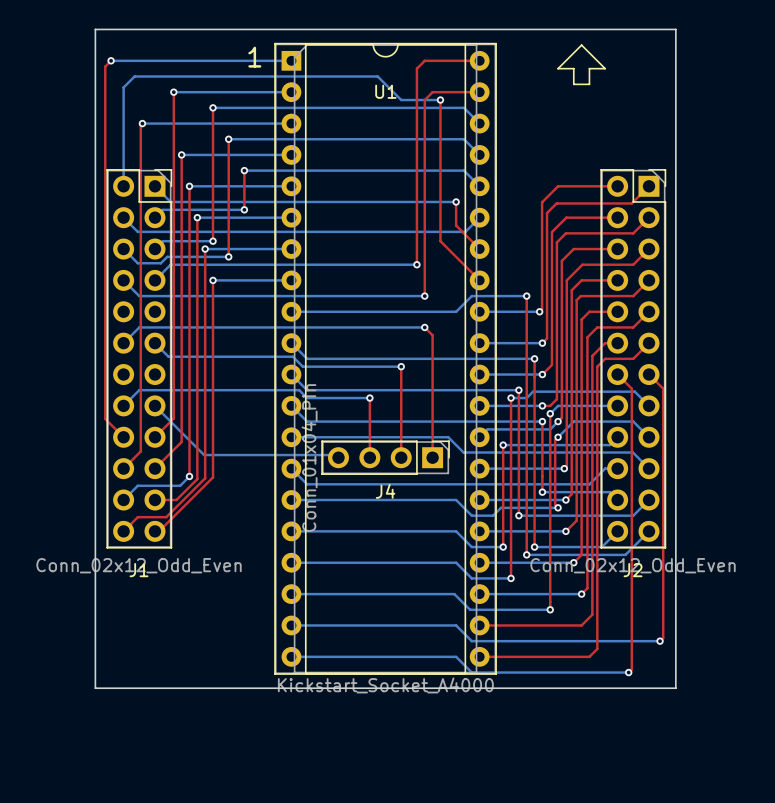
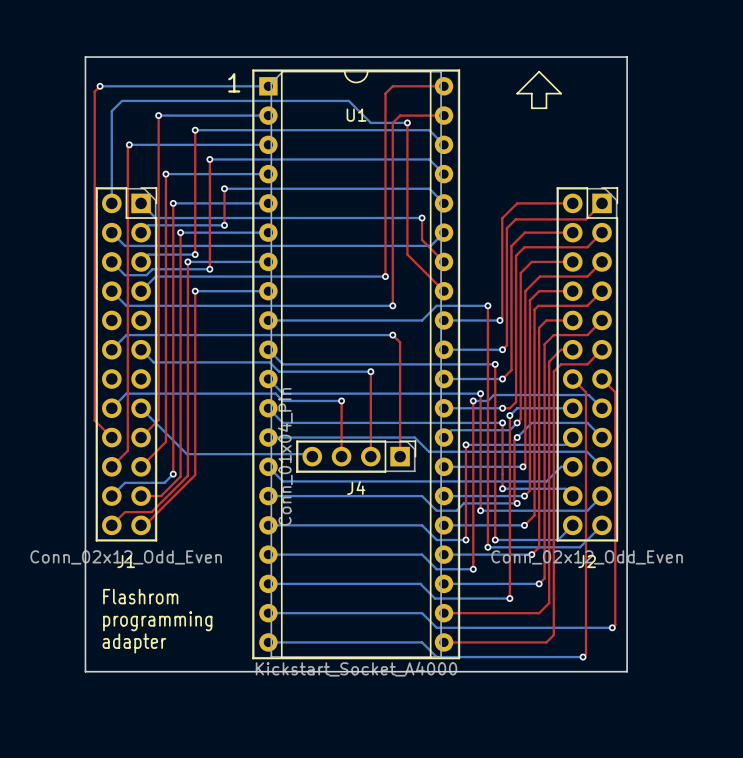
text: none -> Flashrom (140, 596)
text: none -> programming (157, 621)
text: none -> adapter (134, 643)

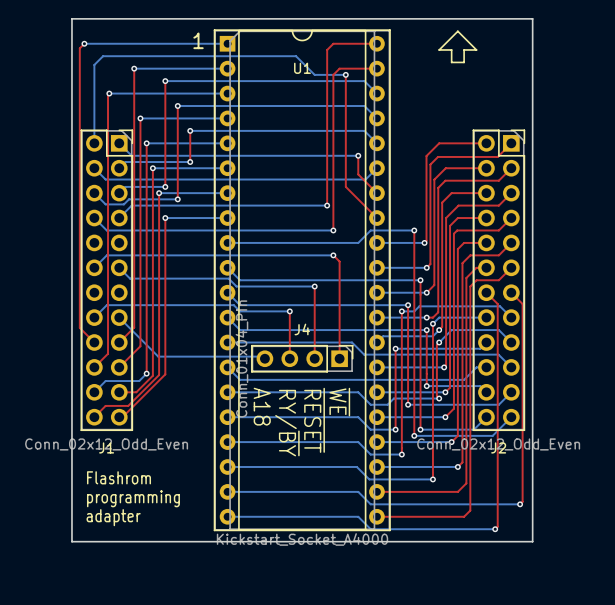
J4 name position: J4 (356, 488) -> J4 (302, 329)
text: none -> ~{WE} (339, 402)
text: none -> A18 (262, 406)
text: none -> ~{RESET} (314, 420)
text: none -> RY/~{BY} (287, 423)

